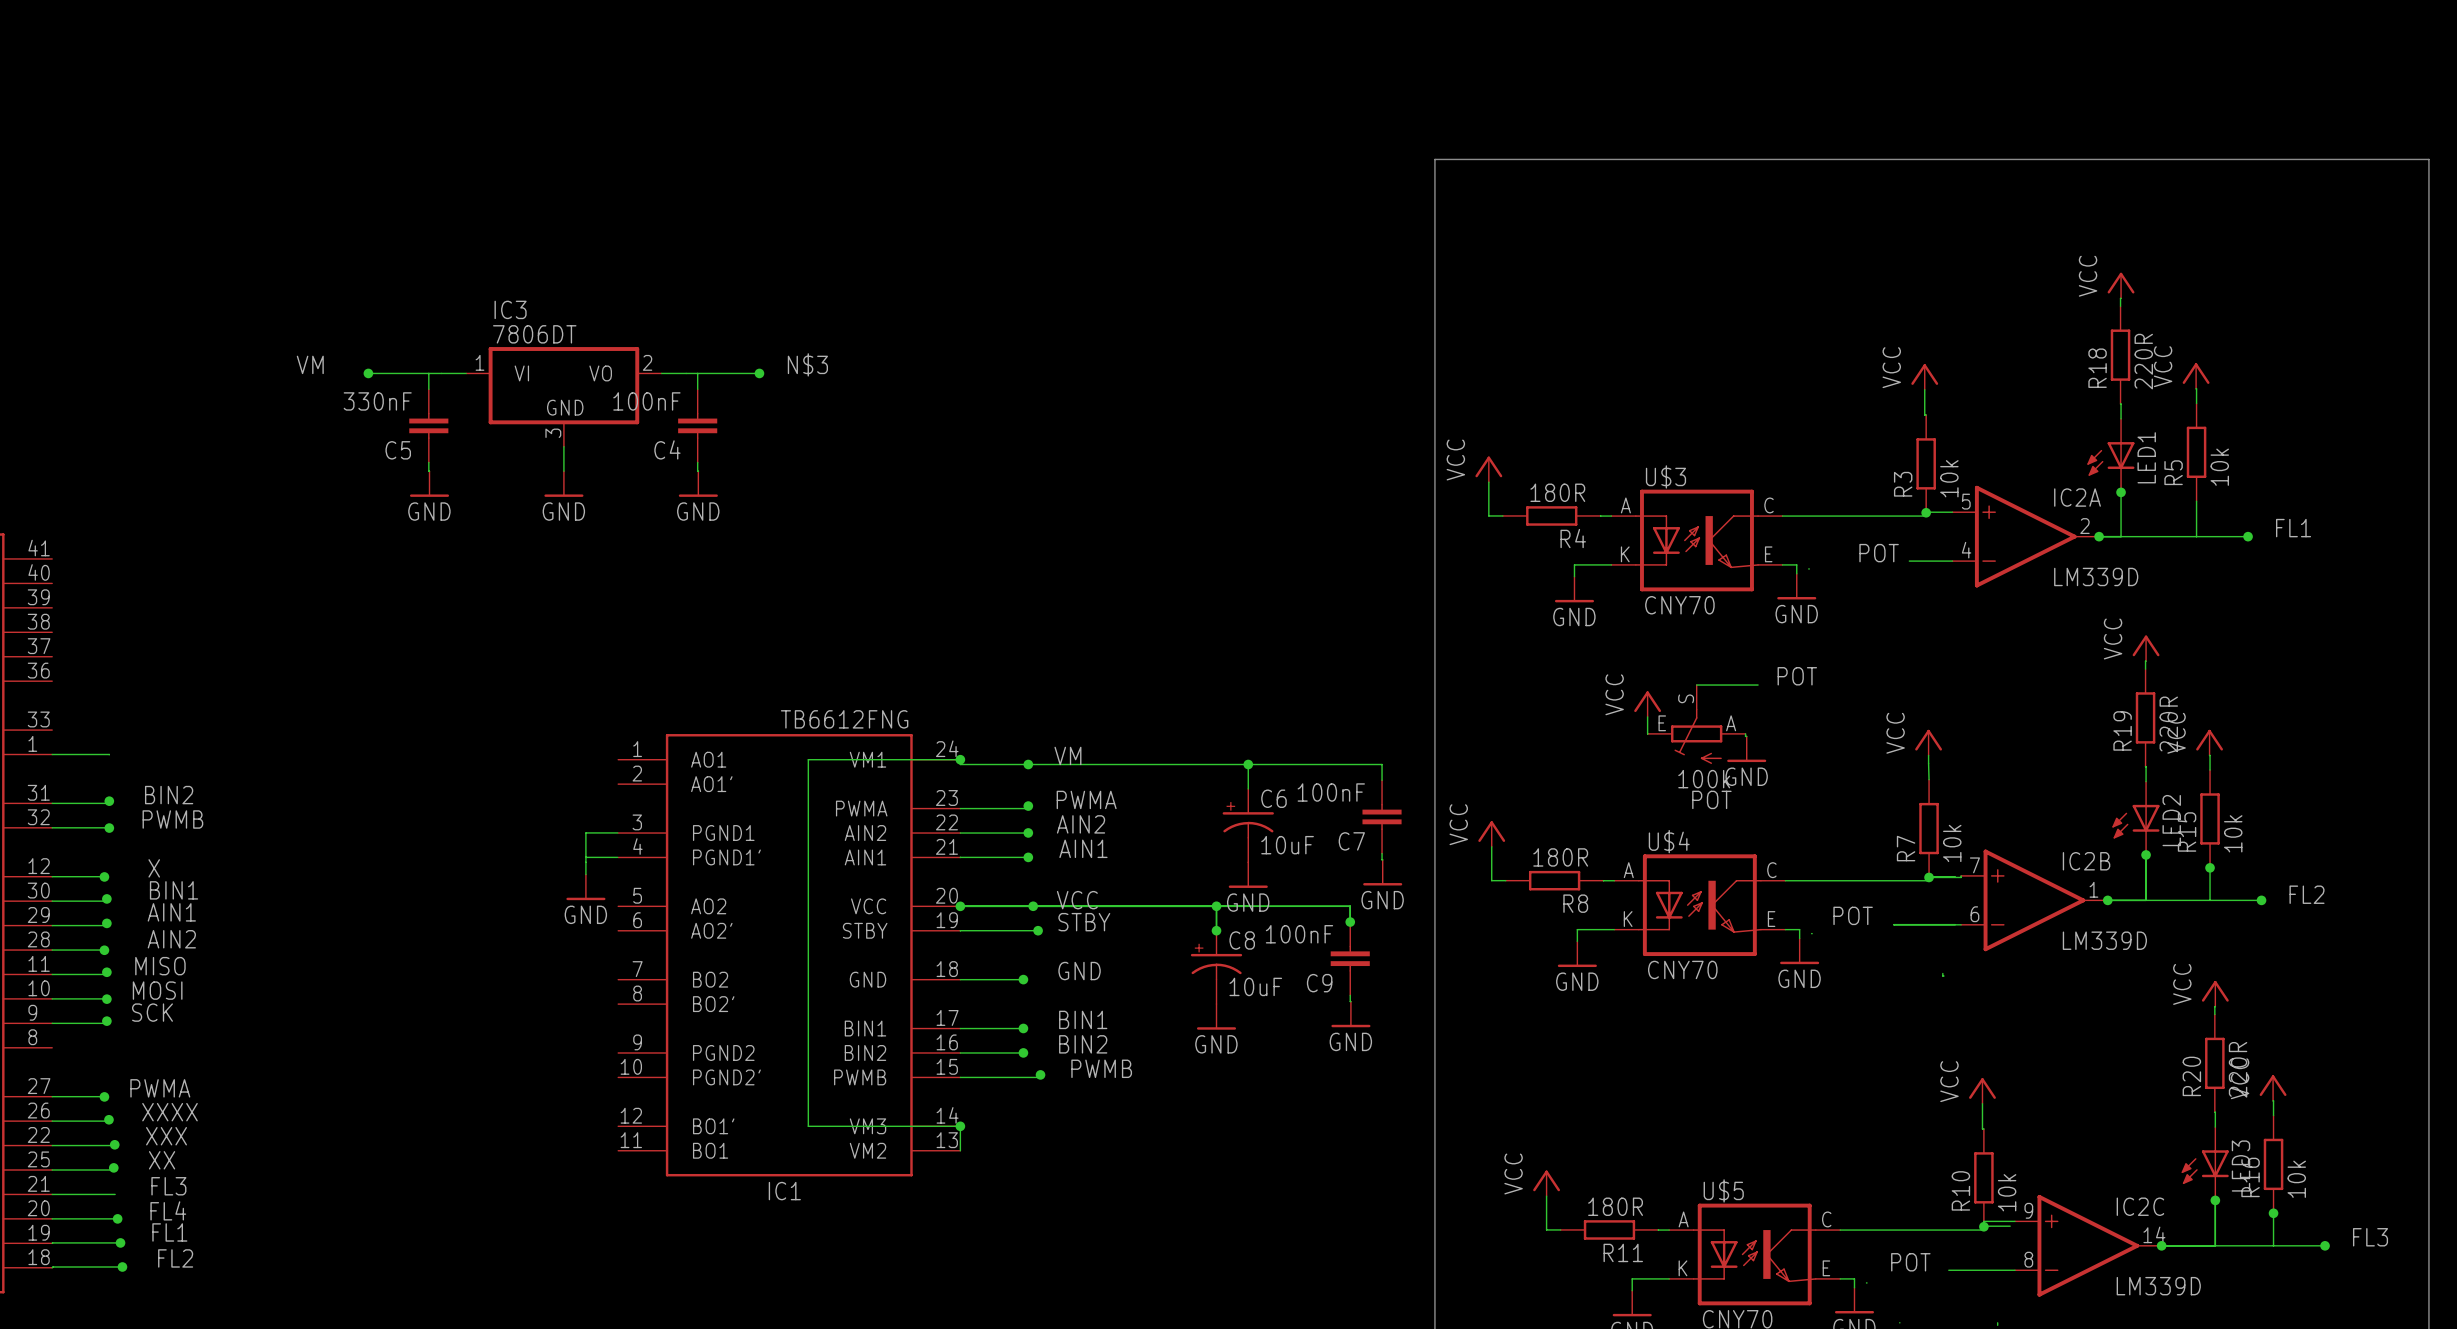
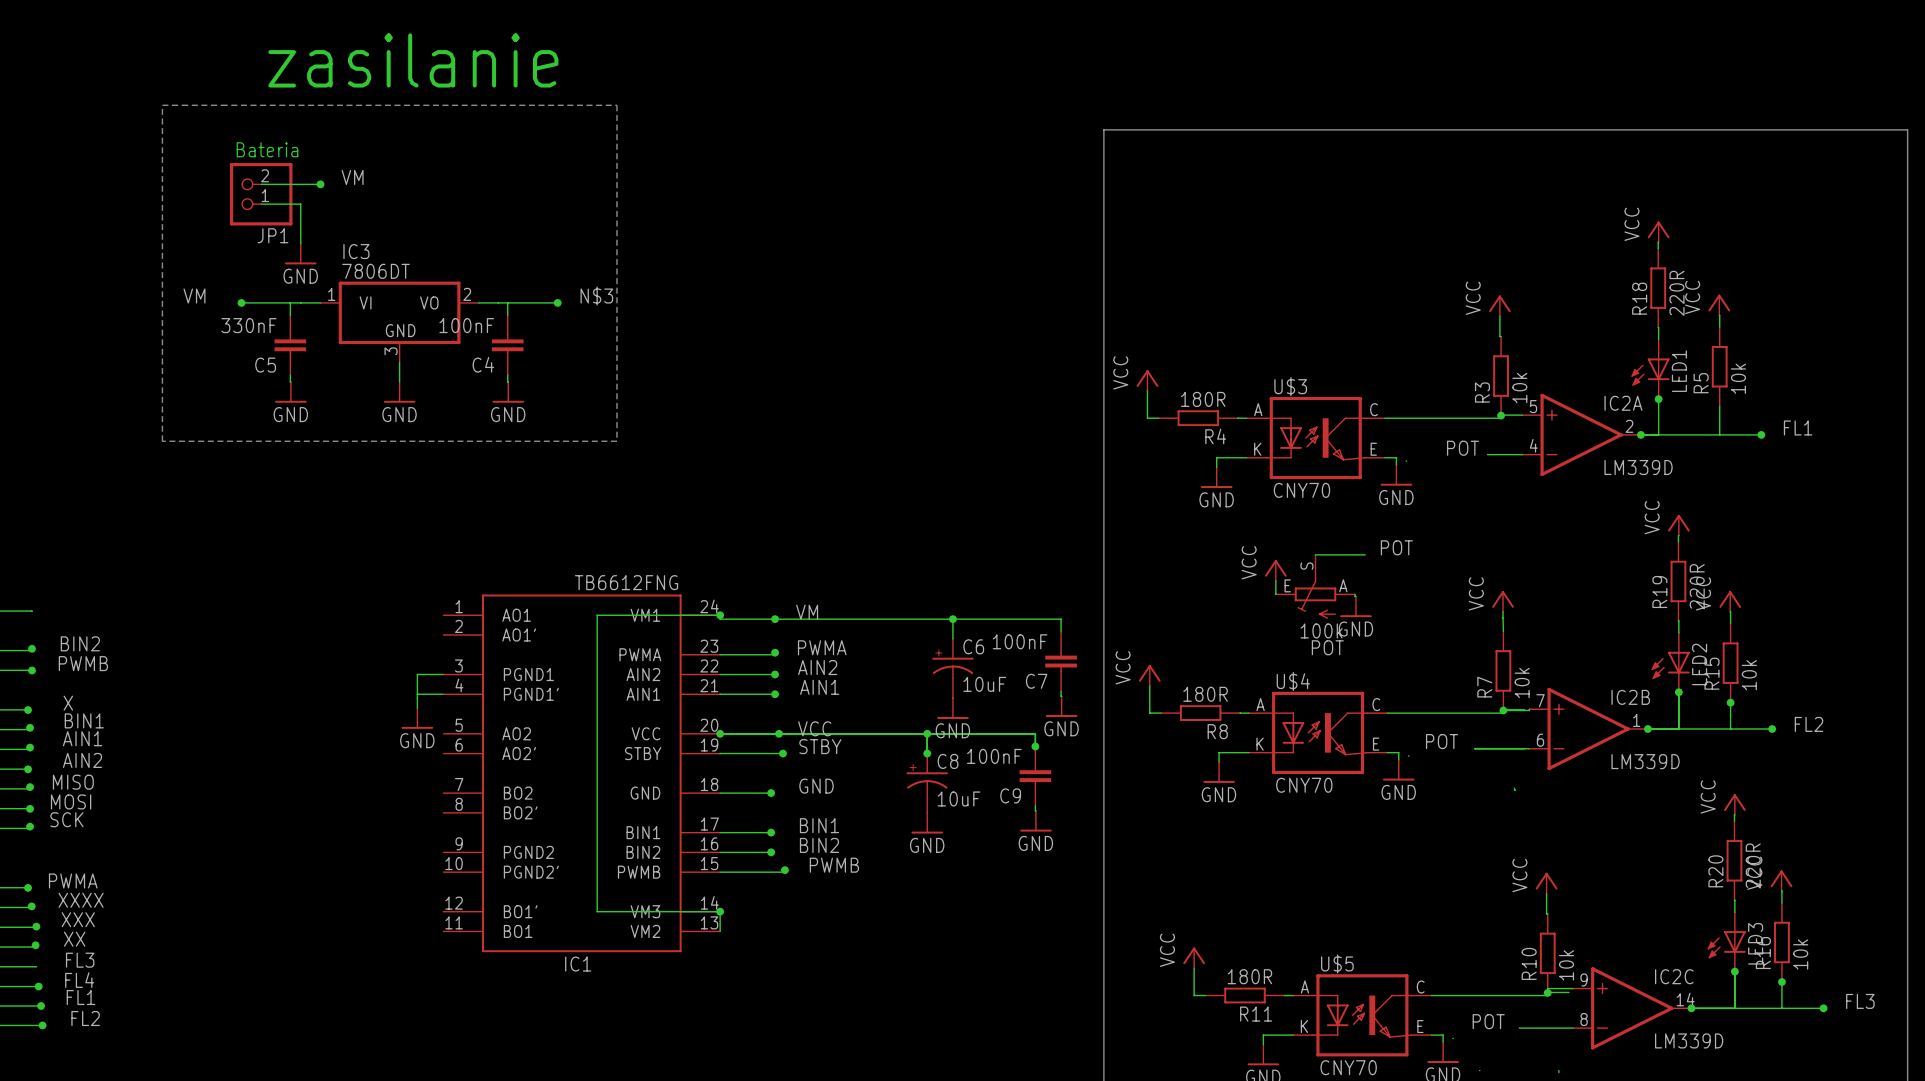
text: none -> zasilanie (413, 60)
bus: none -> (162, 105) (616, 105) (616, 441) (162, 441) (162, 105)
text: none -> Bateria (267, 149)
label: none -> VM (352, 177)
wire: none -> (261, 184) (320, 184)
junction: none -> (320, 184)
JP1: none -> (261, 194)
wire: none -> (261, 204) (300, 204) (300, 243)
power symbol: none -> GND (300, 254)

